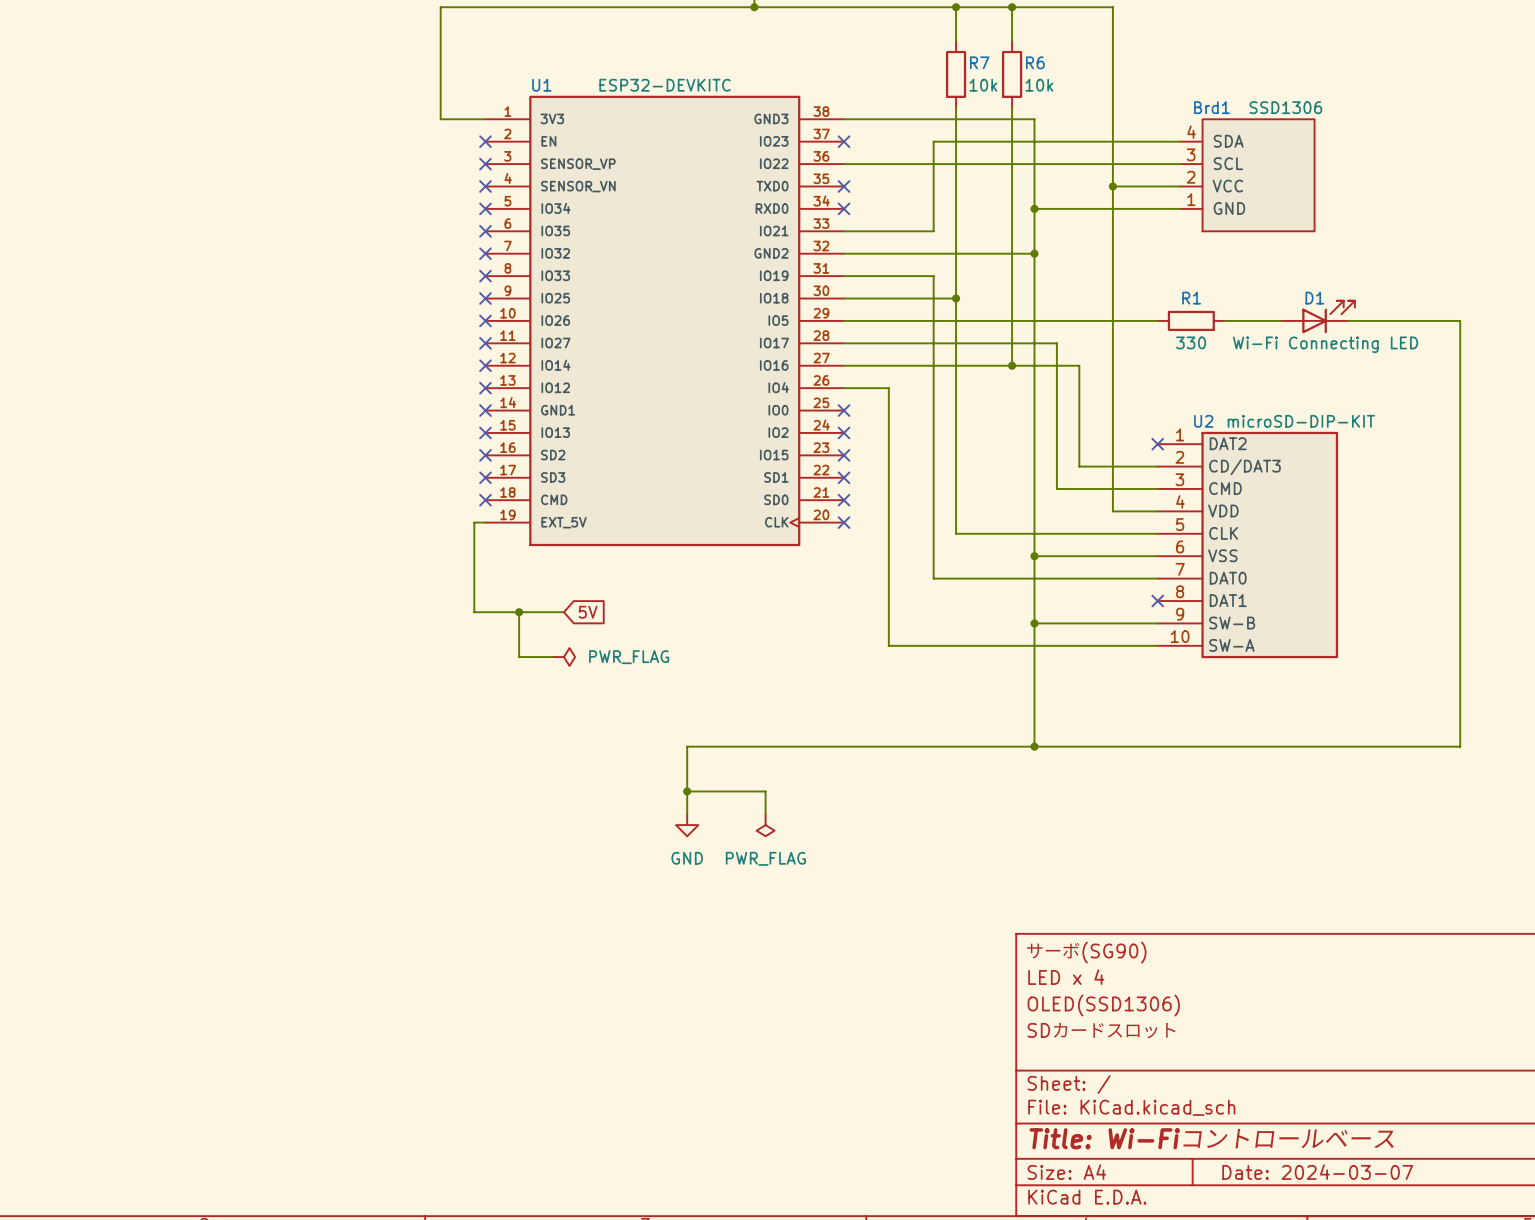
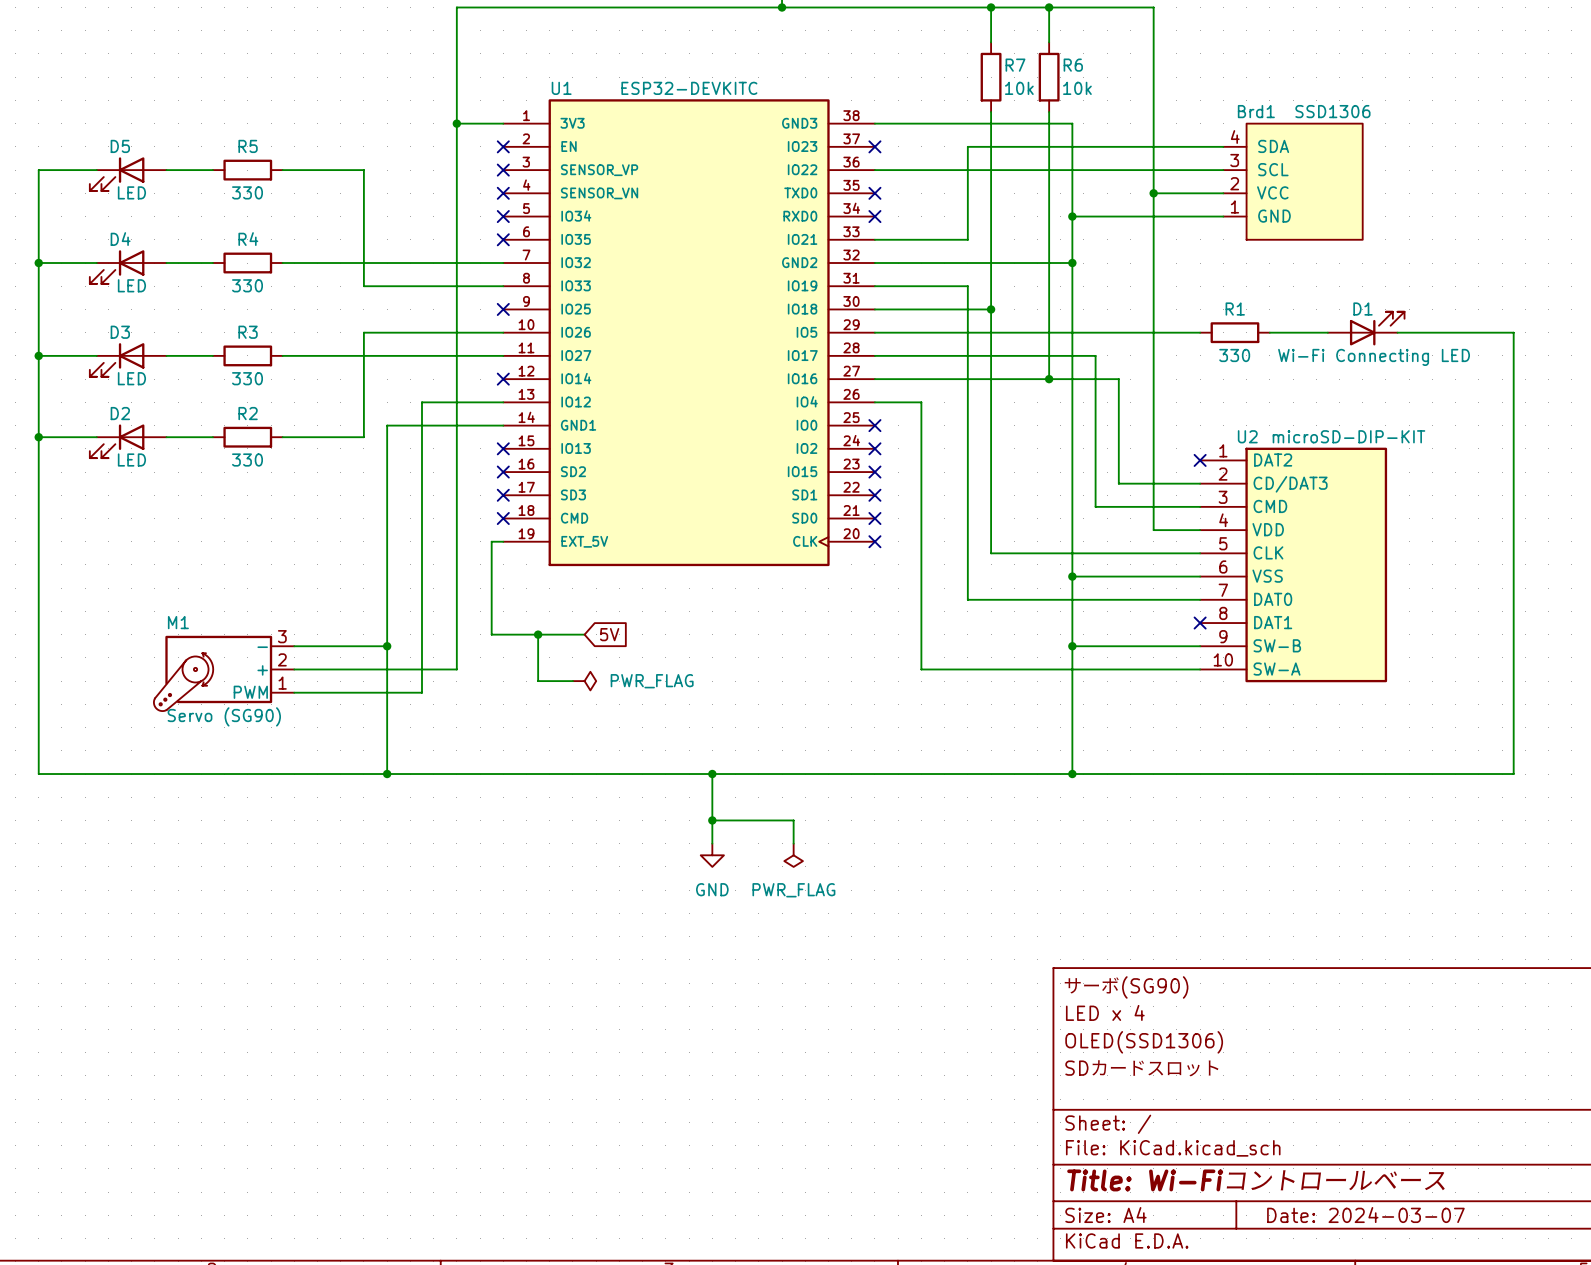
wire: none -> (456, 123) (456, 669) (294, 669)
junction: none -> (456, 123)
wire: none -> (96, 170) (38, 170) (38, 774) (712, 774)
wire: none -> (166, 170) (212, 170)
R5: none -> 330 (247, 170)
wire: none -> (282, 170) (363, 170) (363, 286) (503, 286)
D5: none -> LED (128, 174)
wire: none -> (38, 263) (96, 263)
junction: none -> (38, 263)
wire: none -> (166, 263) (212, 263)
R4: none -> 330 (247, 263)
wire: none -> (282, 263) (503, 263)
no-connect mark: (485, 253) -> none
D4: none -> LED (128, 267)
no-connect mark: (485, 276) -> none
wire: none -> (503, 332) (363, 332) (363, 437) (282, 437)
no-connect mark: (485, 320) -> none
wire: none -> (38, 355) (96, 355)
junction: none -> (38, 355)
wire: none -> (166, 355) (212, 355)
R3: none -> 330 (247, 355)
wire: none -> (282, 355) (503, 355)
no-connect mark: (485, 343) -> none
D3: none -> LED (128, 359)
wire: none -> (503, 402) (421, 402) (421, 692) (294, 692)
no-connect mark: (485, 388) -> none
wire: none -> (503, 425) (387, 425) (387, 774)
no-connect mark: (485, 410) -> none
wire: none -> (38, 437) (96, 437)
junction: none -> (38, 437)
wire: none -> (166, 437) (212, 437)
R2: none -> 330 (247, 437)
D2: none -> LED (128, 441)
wire: none -> (294, 646) (387, 646)
junction: none -> (387, 646)
M1: none -> Servo (SG90) (224, 673)
junction: none -> (387, 774)
junction: none -> (712, 774)

